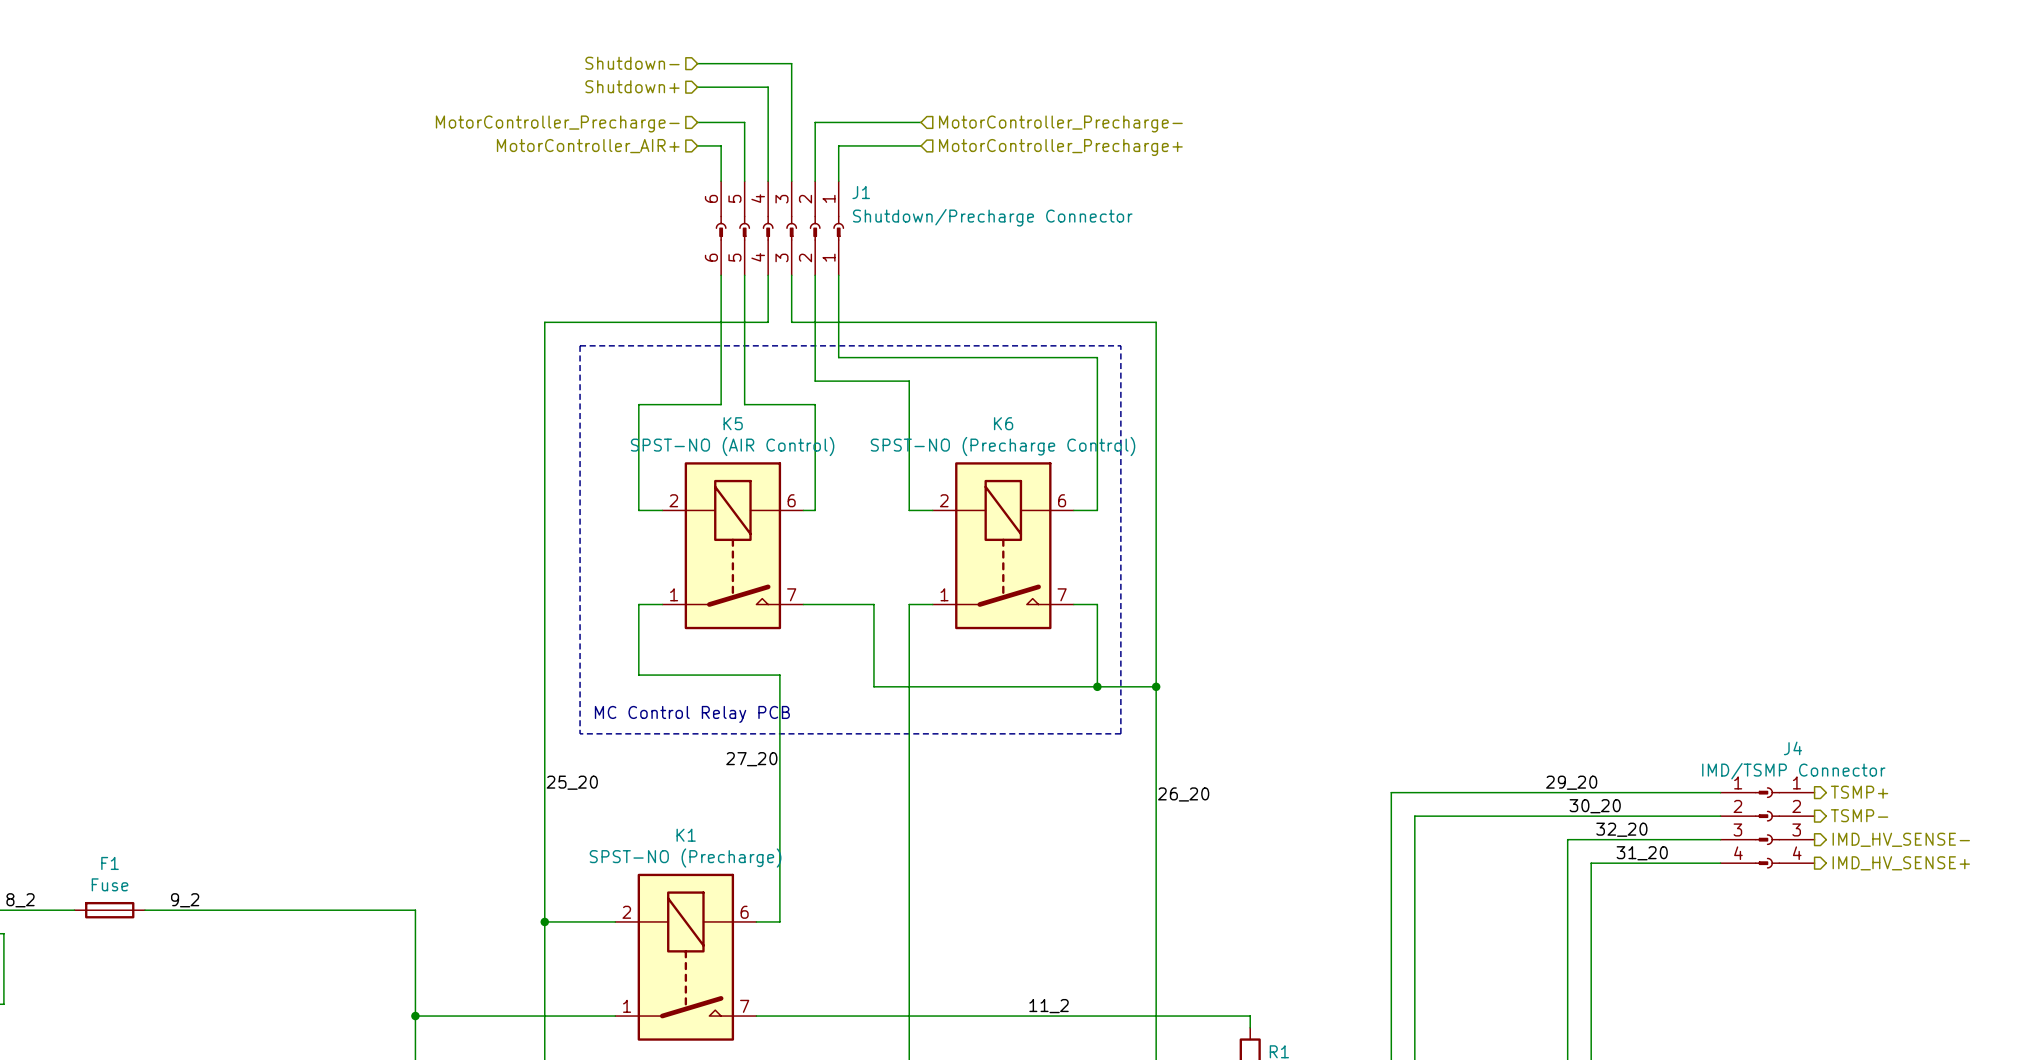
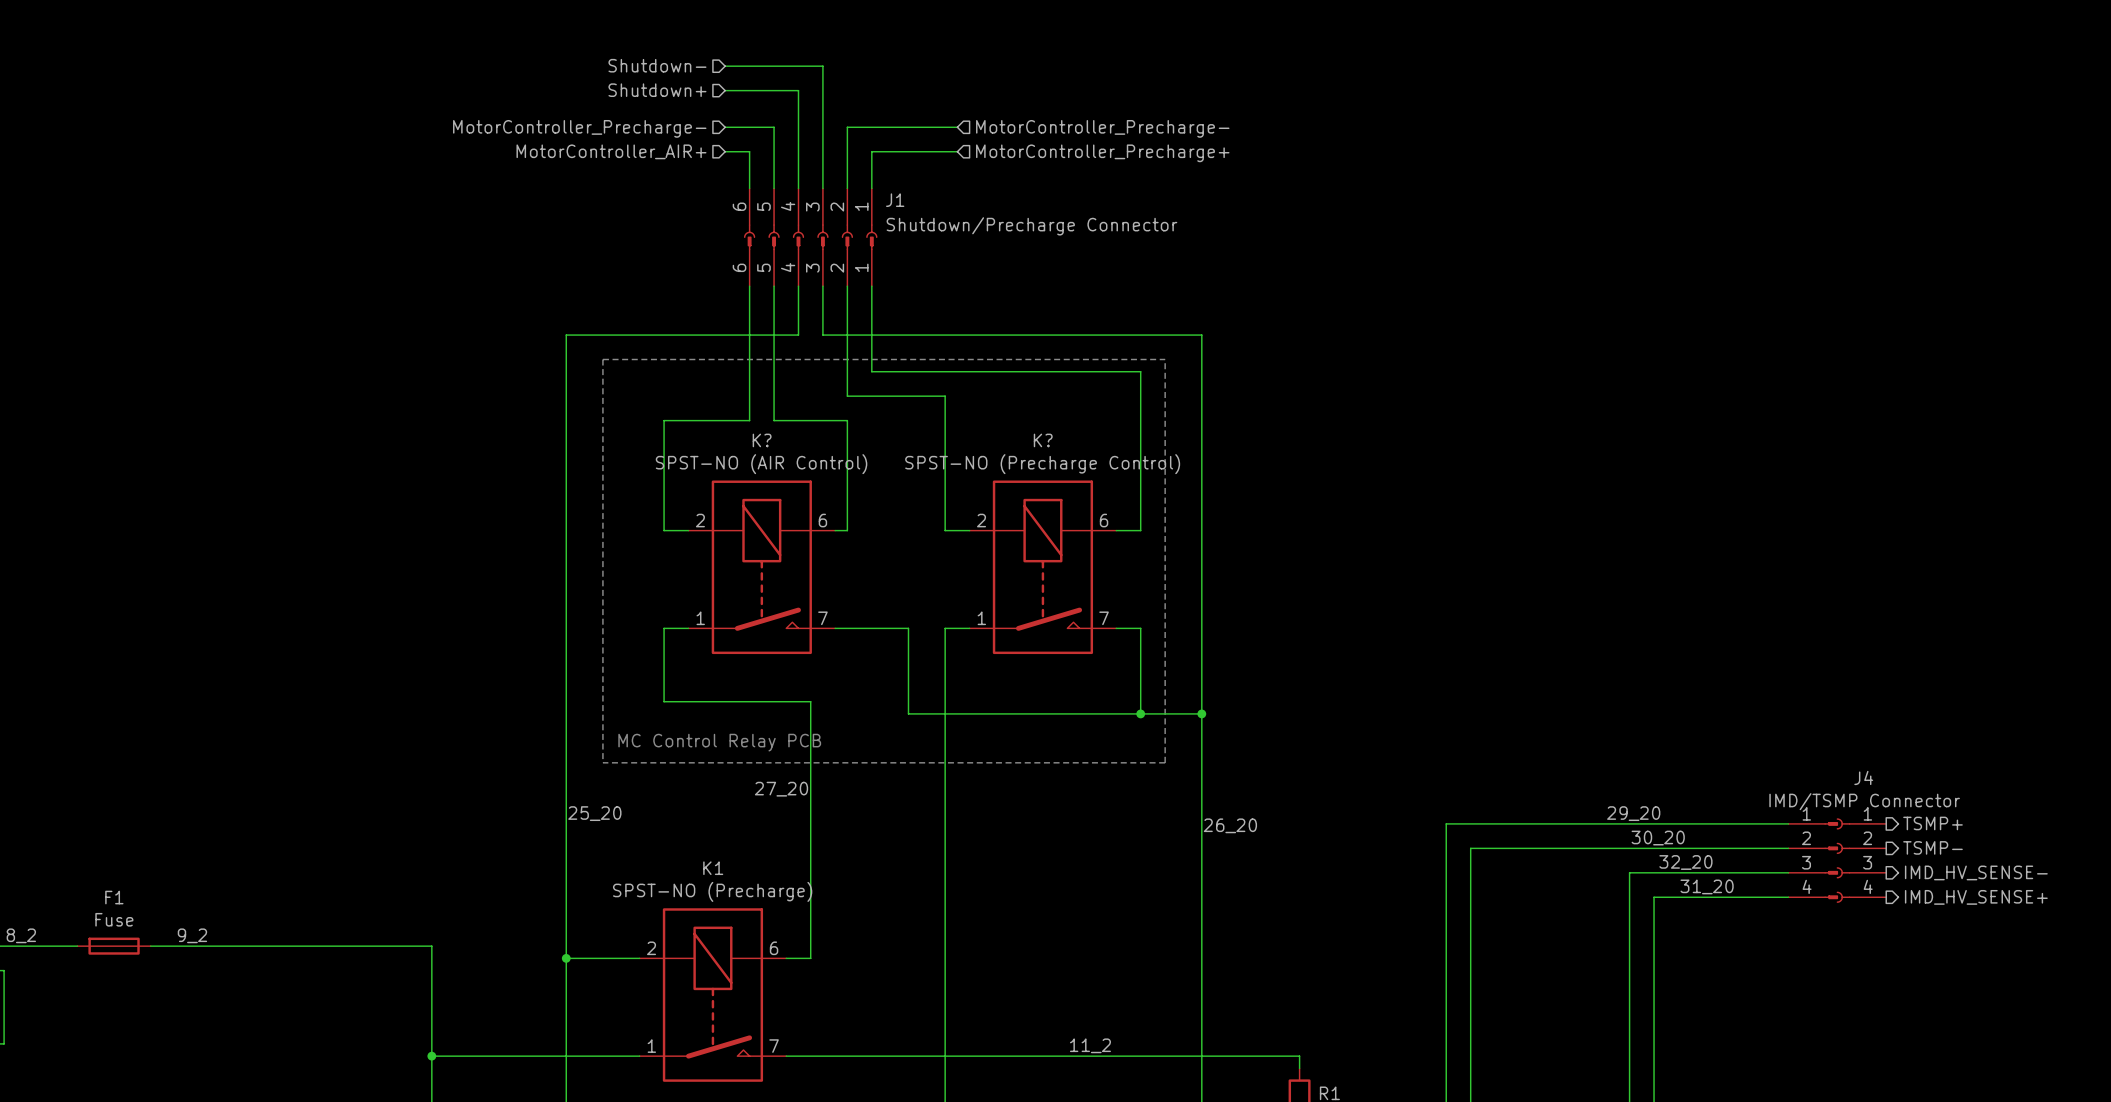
K5 name: K5 (733, 423) -> K? (762, 440)
K6 name: K6 (1003, 423) -> K? (1043, 440)

